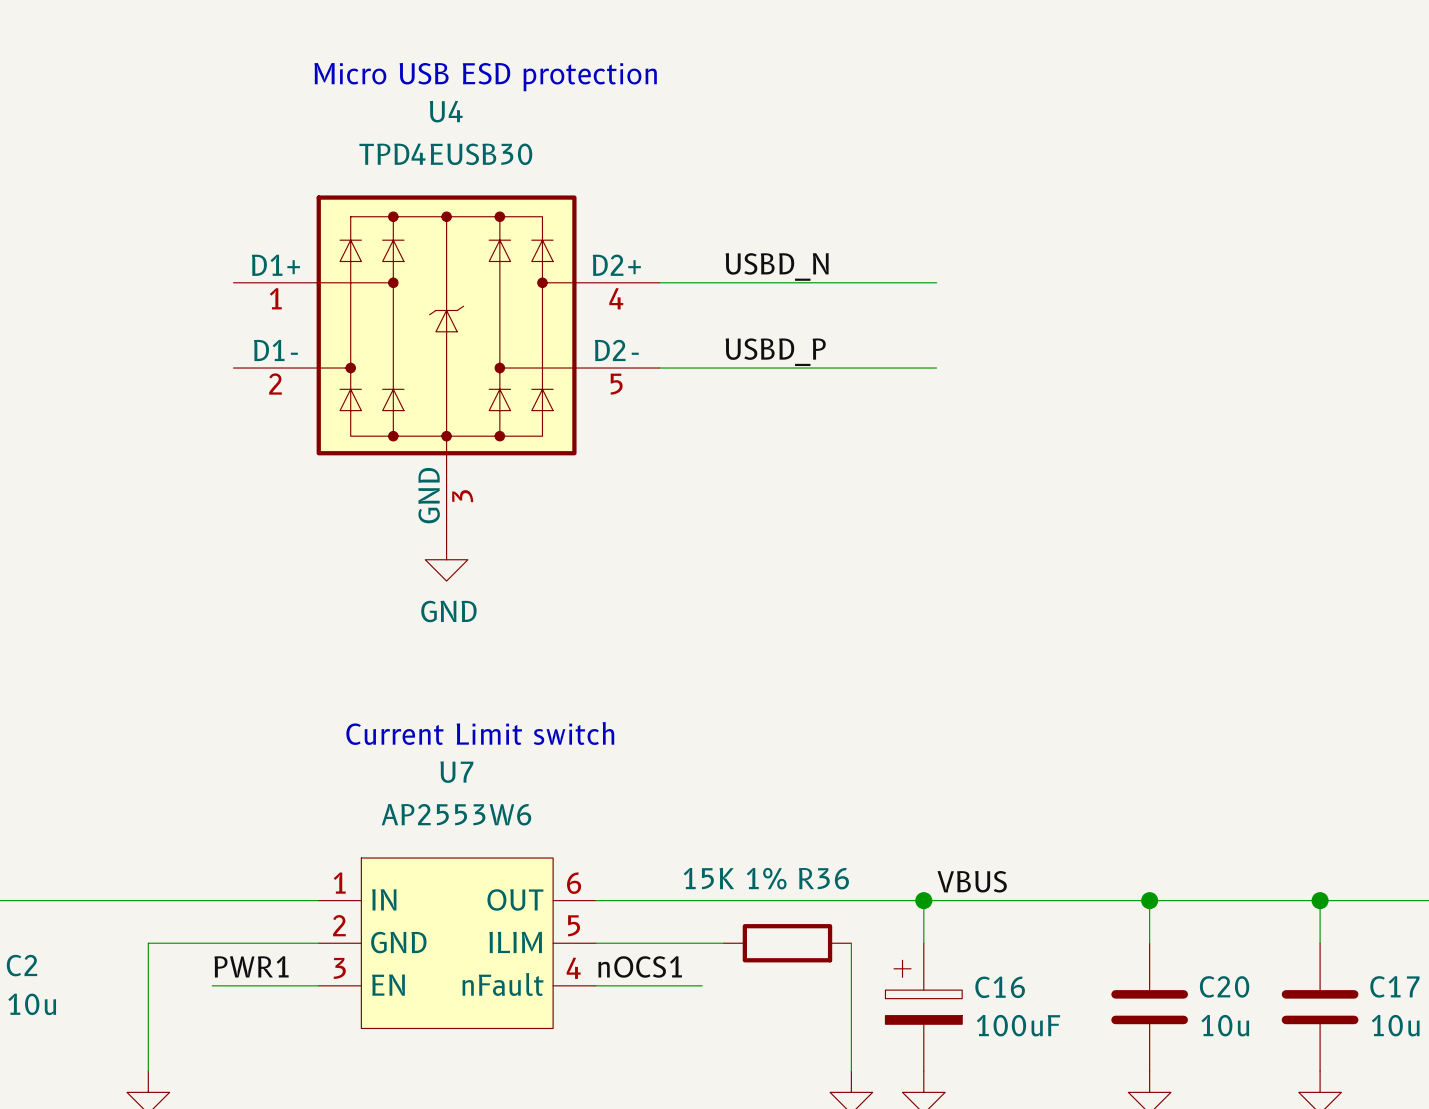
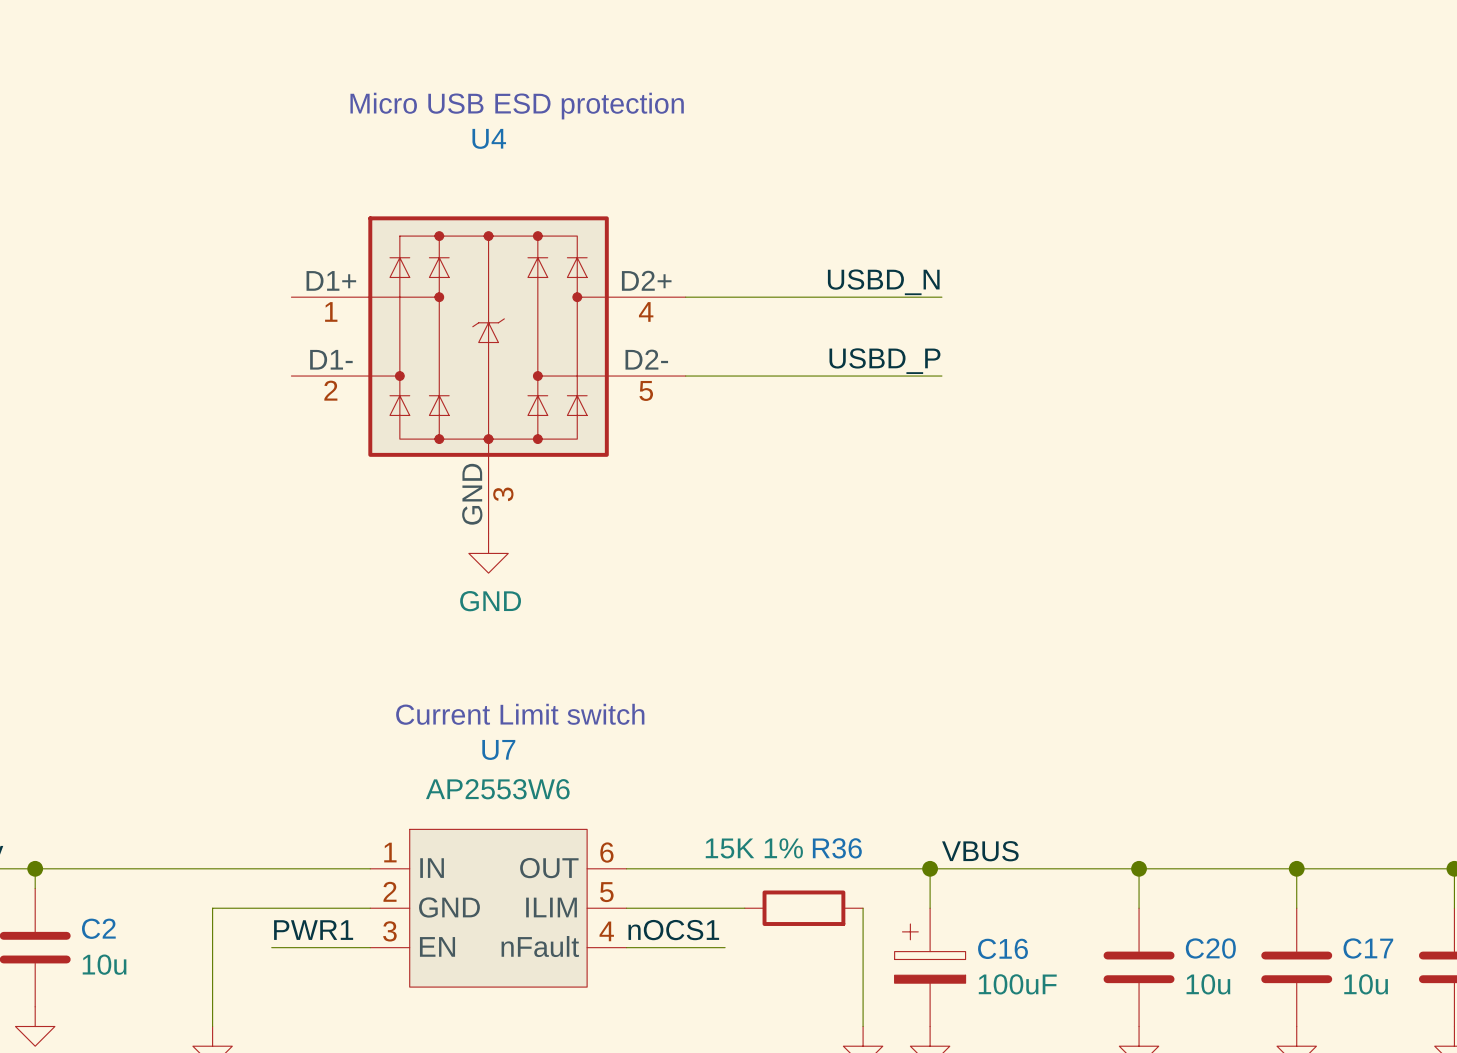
U4 value: TPD4EUSB30 (445, 154) -> none
label position: USBD_N (777, 266) -> USBD_N (883, 282)
label position: USBD_P (775, 352) -> USBD_P (884, 361)

